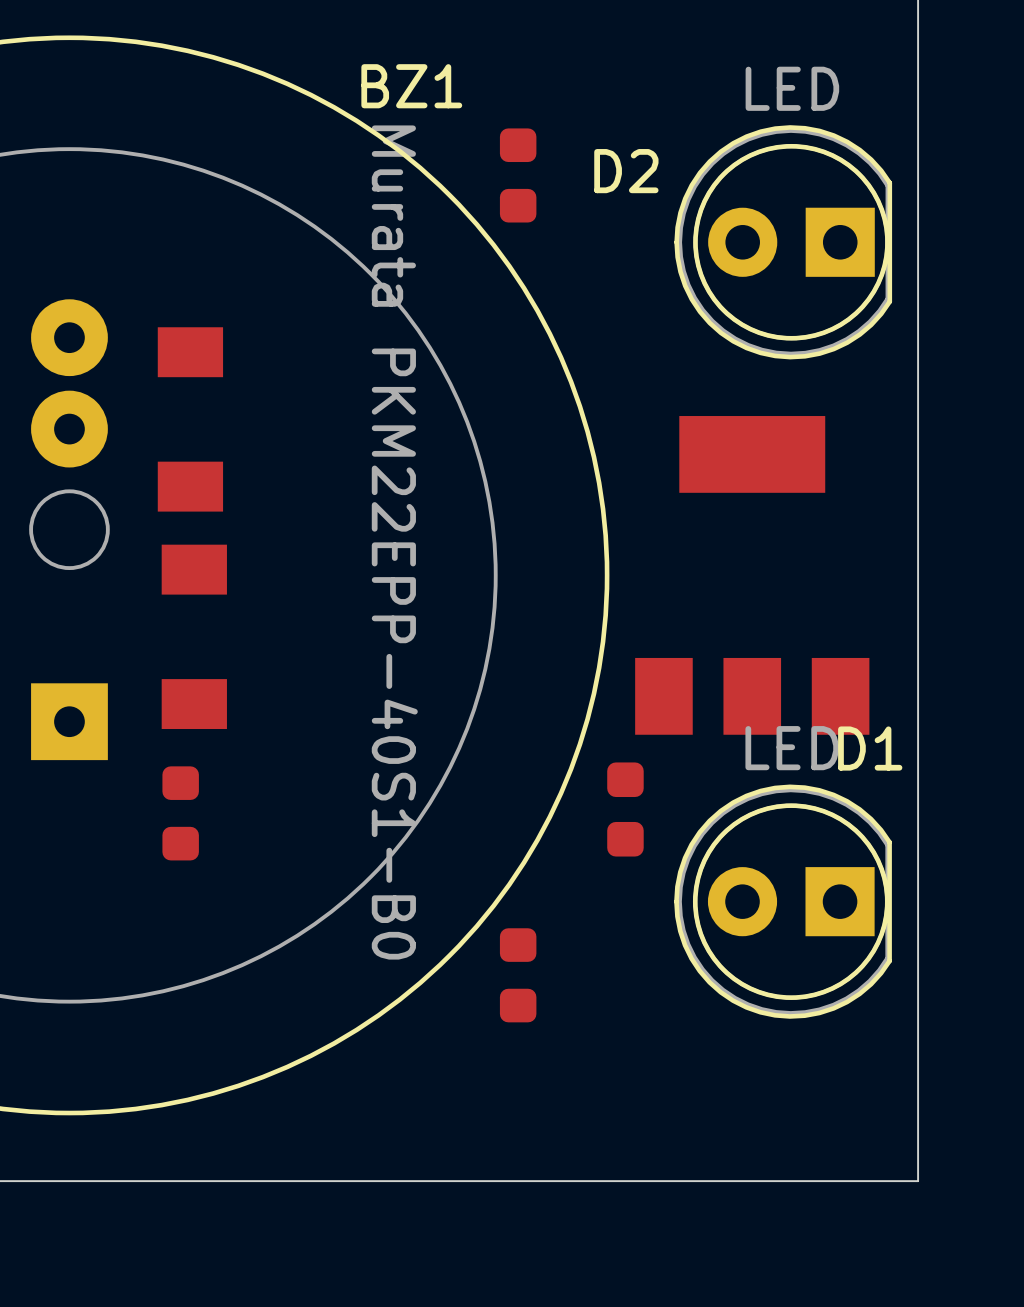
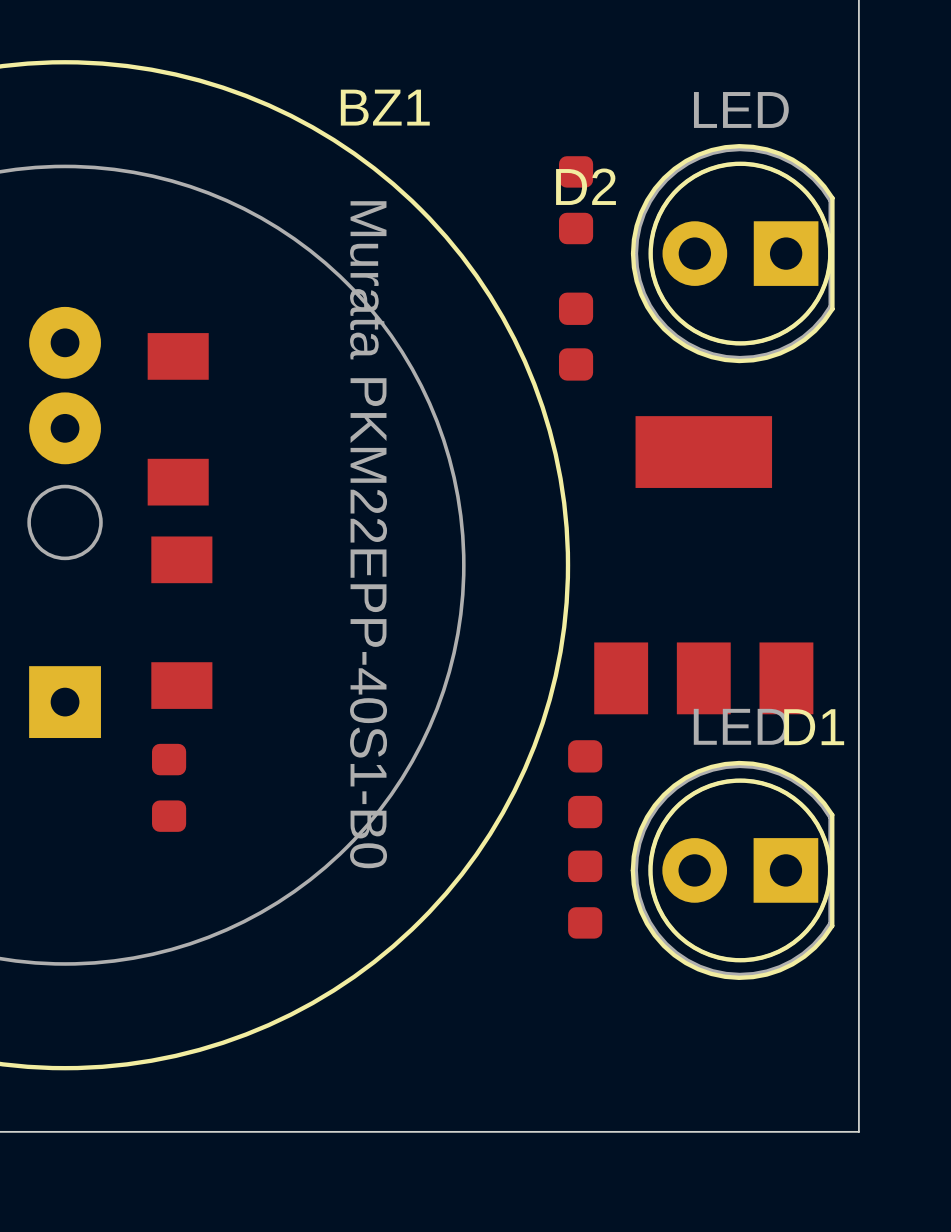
part position: (518, 175) -> (576, 200)
part: none -> (576, 336)
part position: (518, 975) -> (585, 894)

